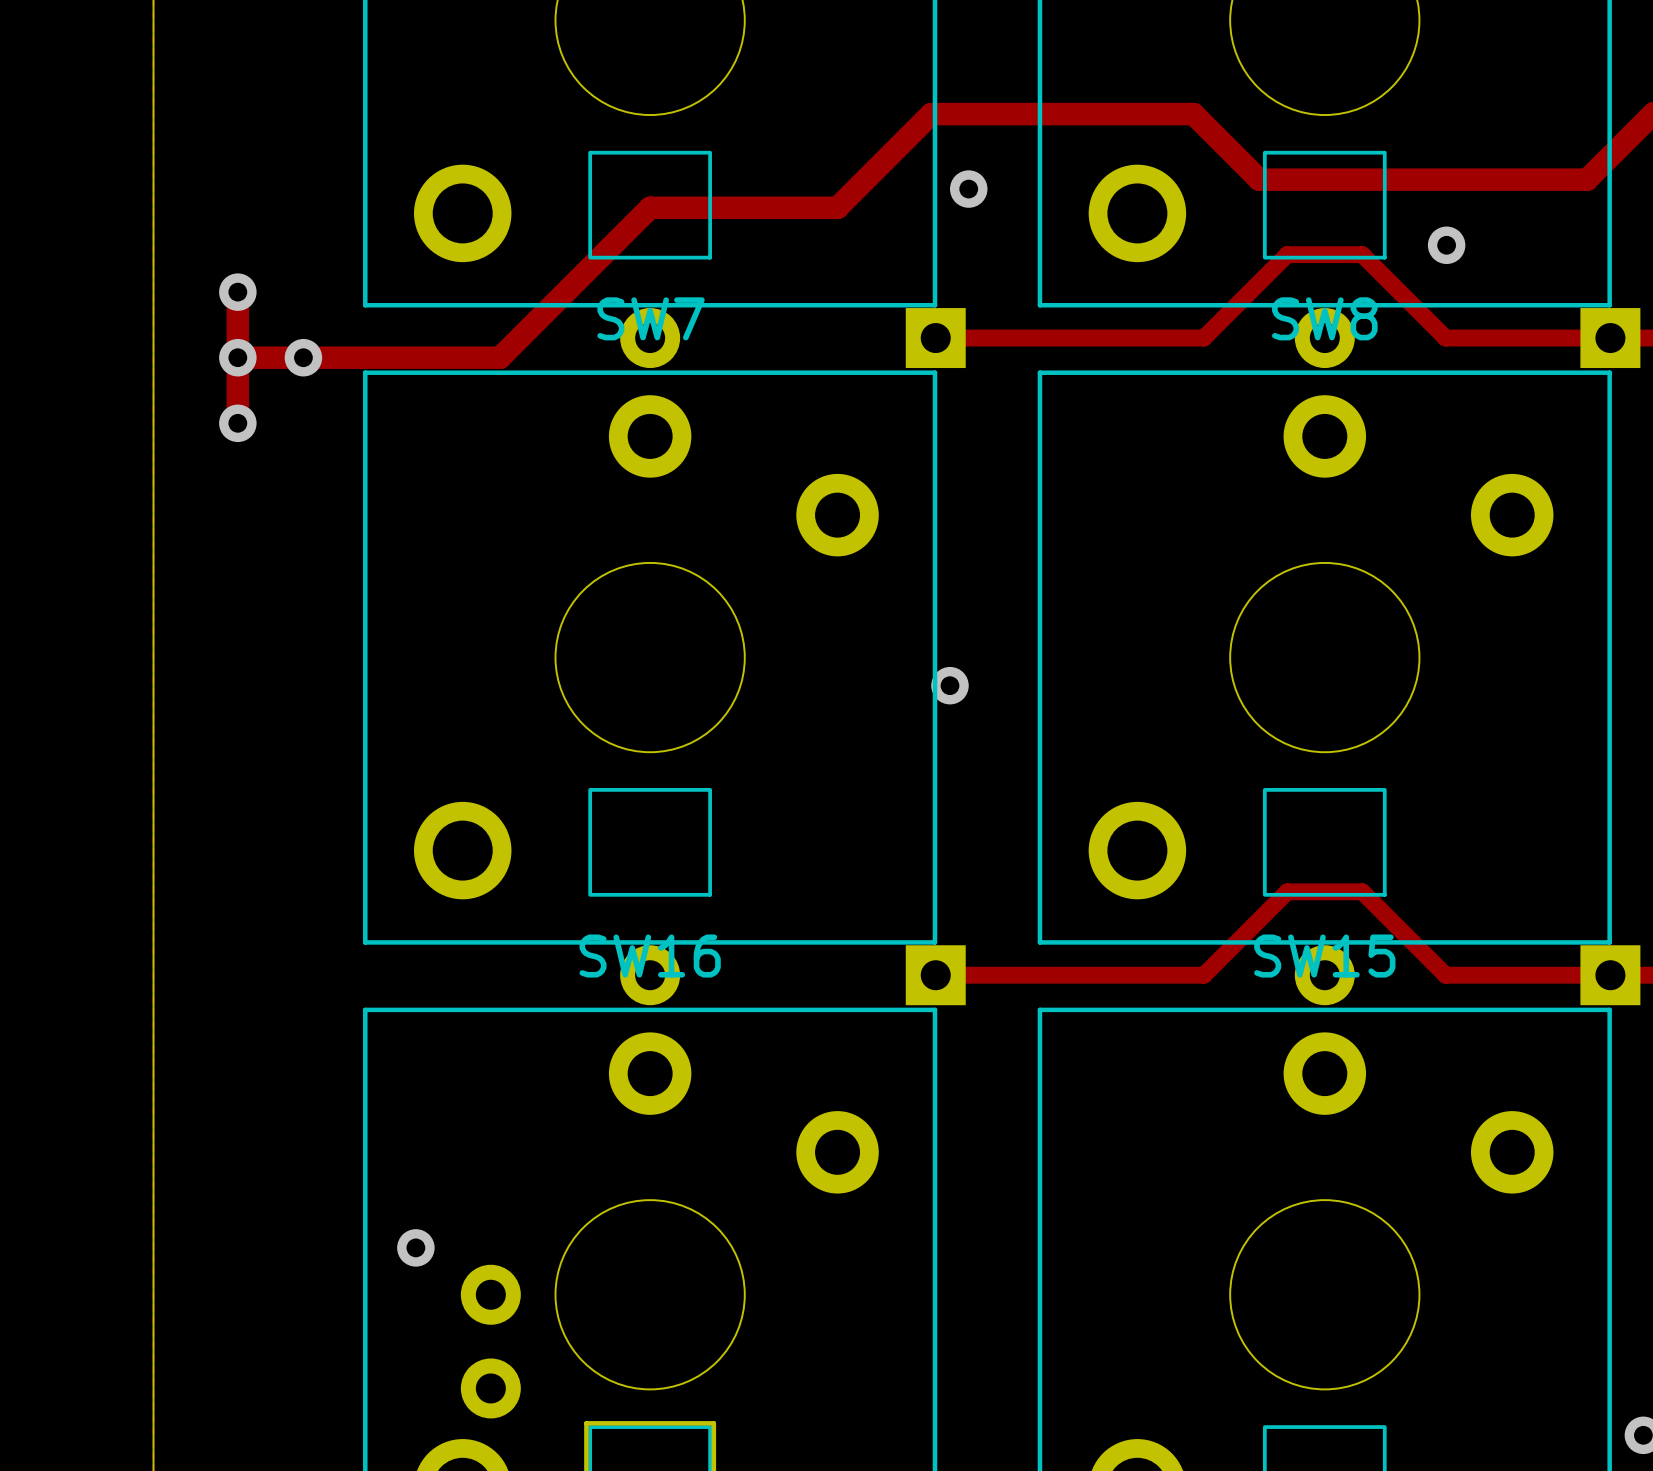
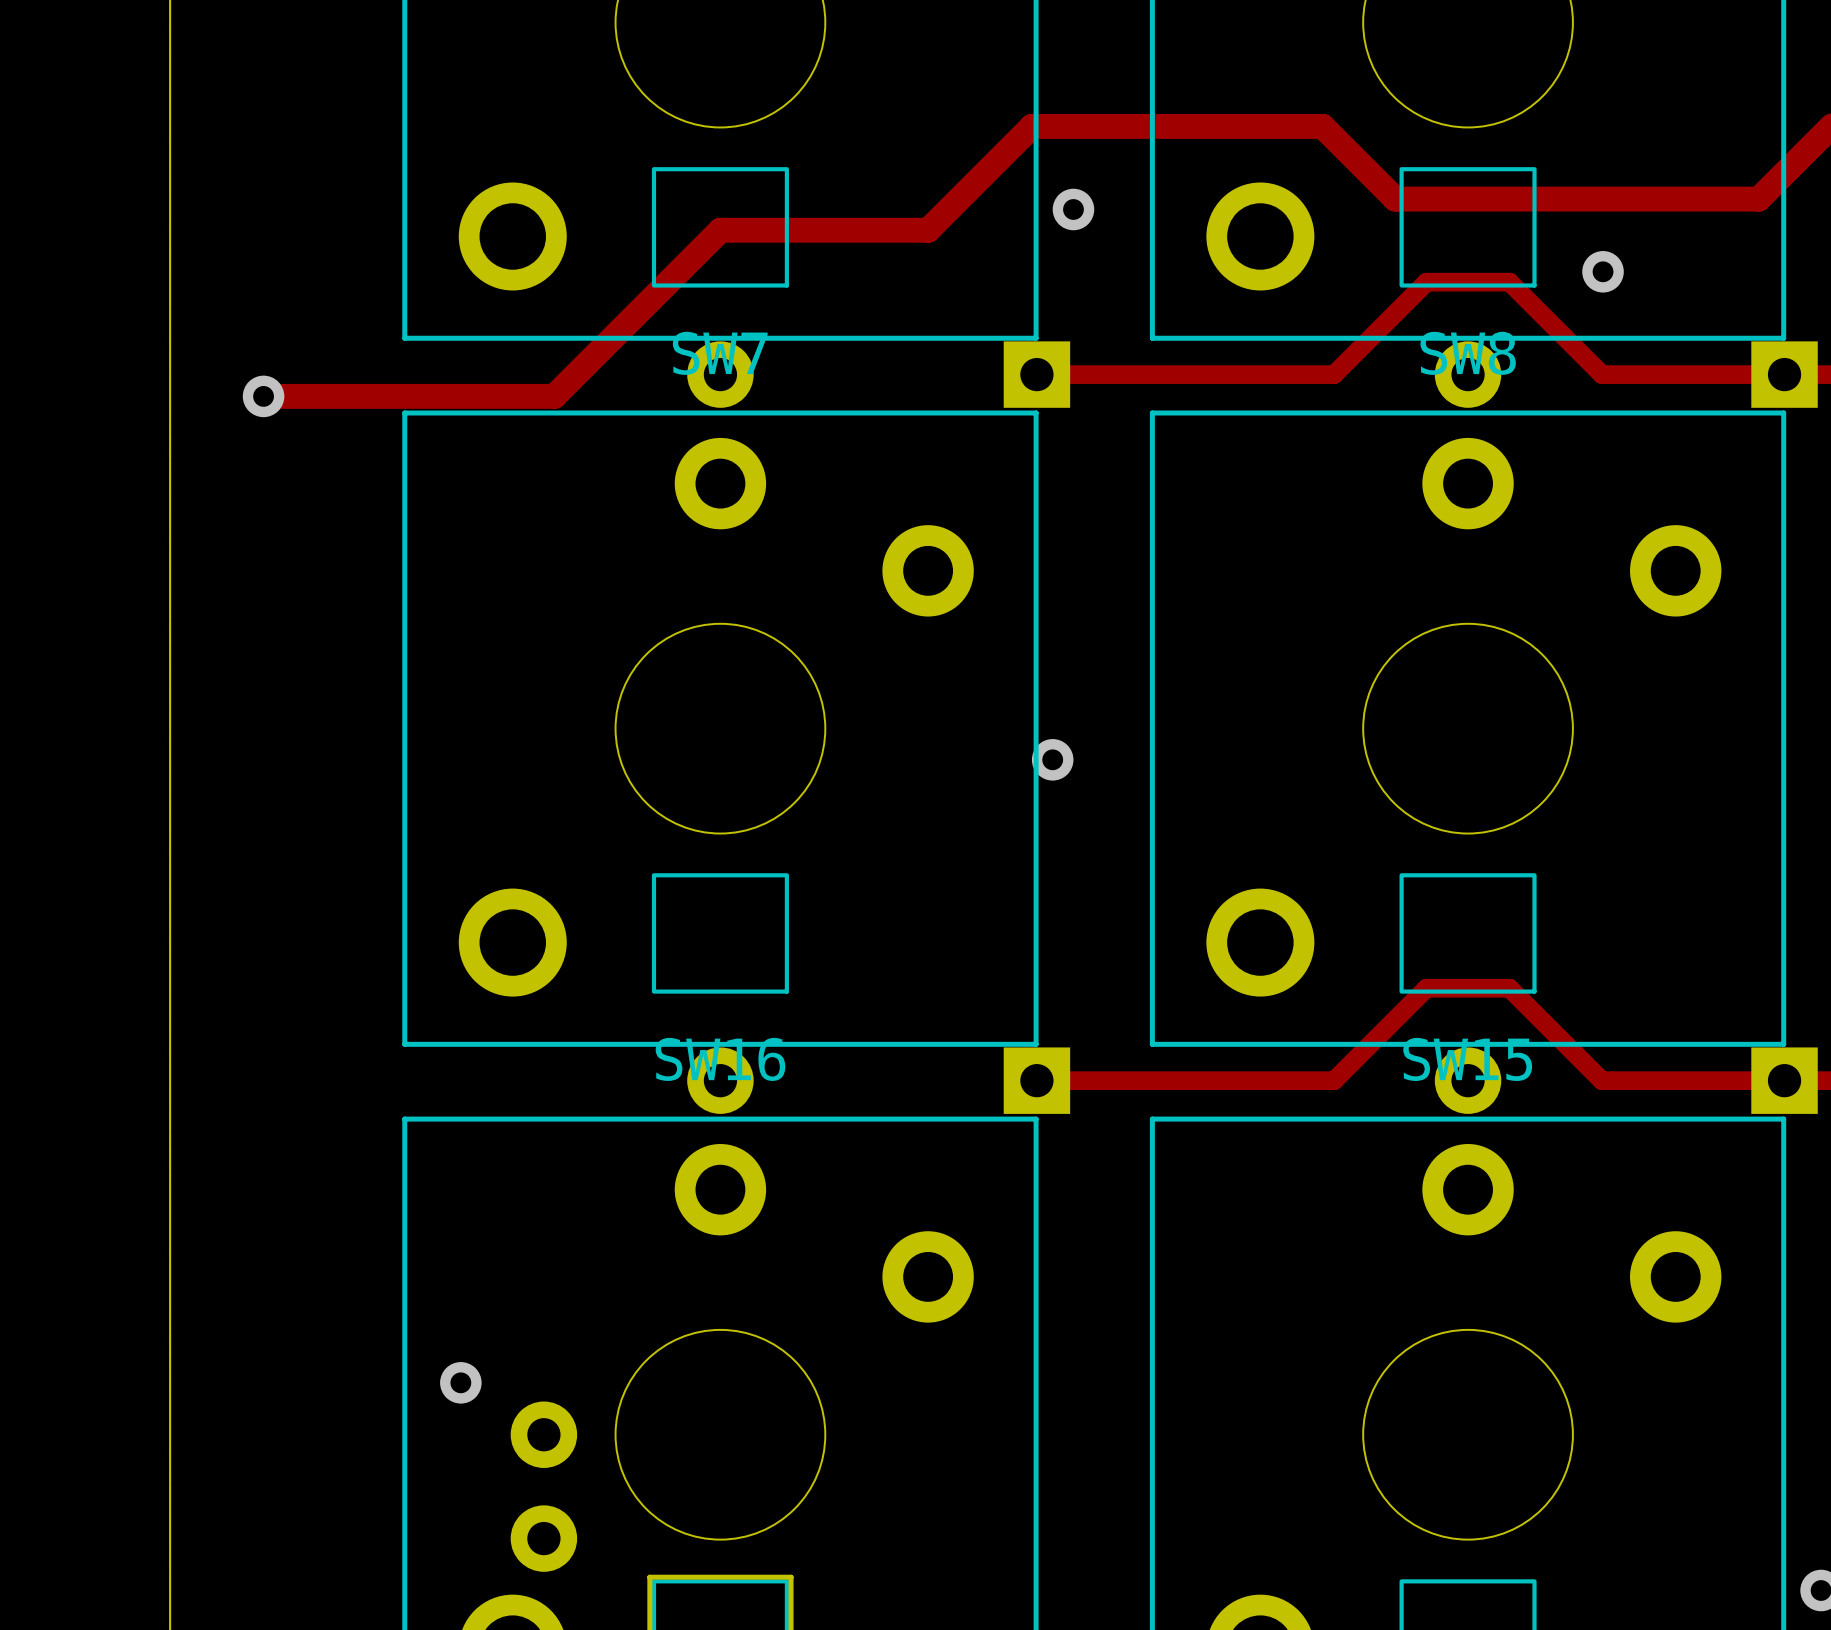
track: (237, 292) (237, 423) -> none
via: (237, 292) -> none
via: (303, 357) -> none
via: (237, 423) -> none

